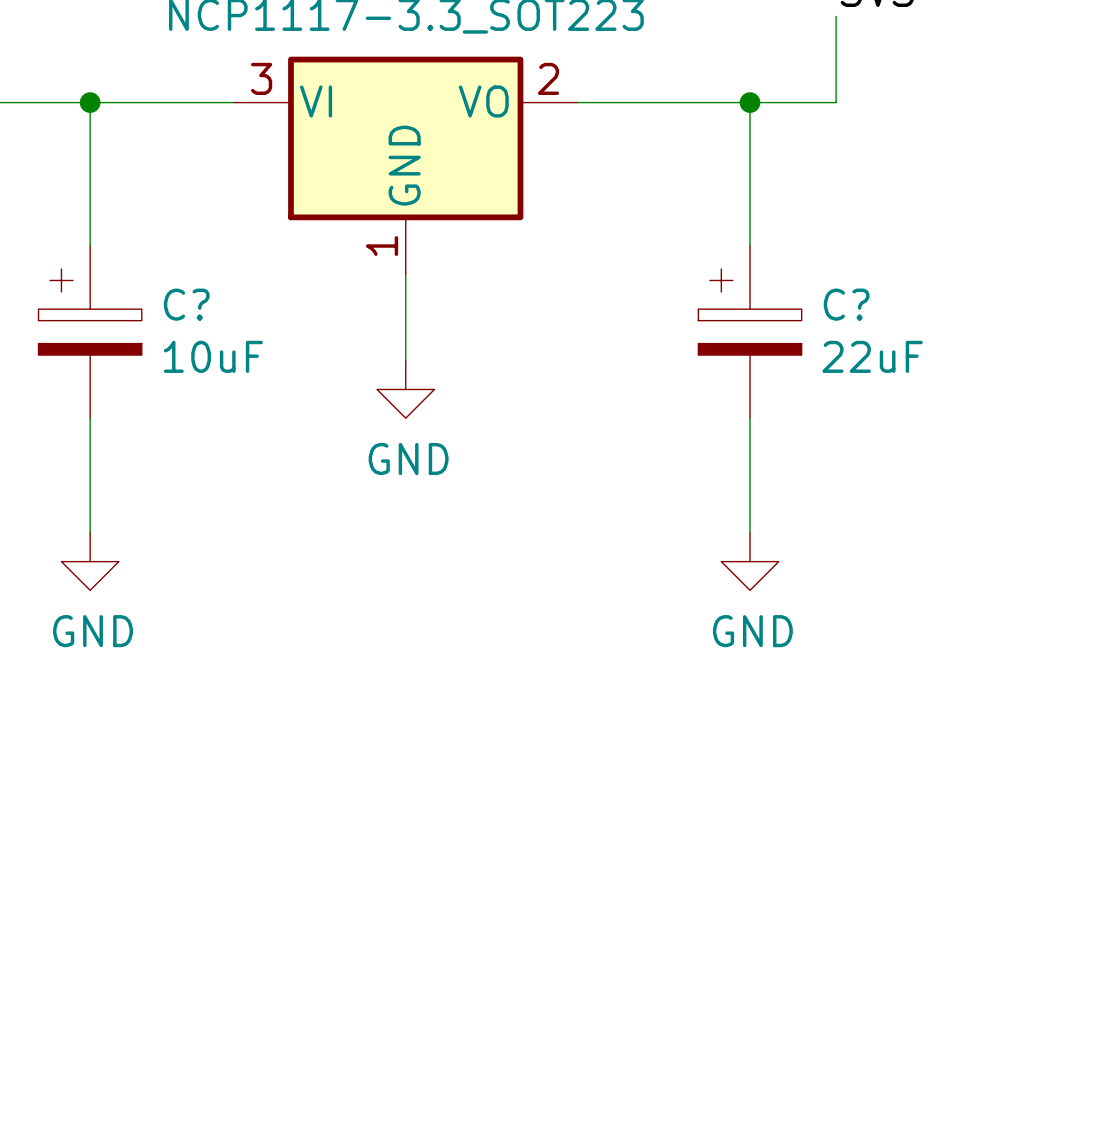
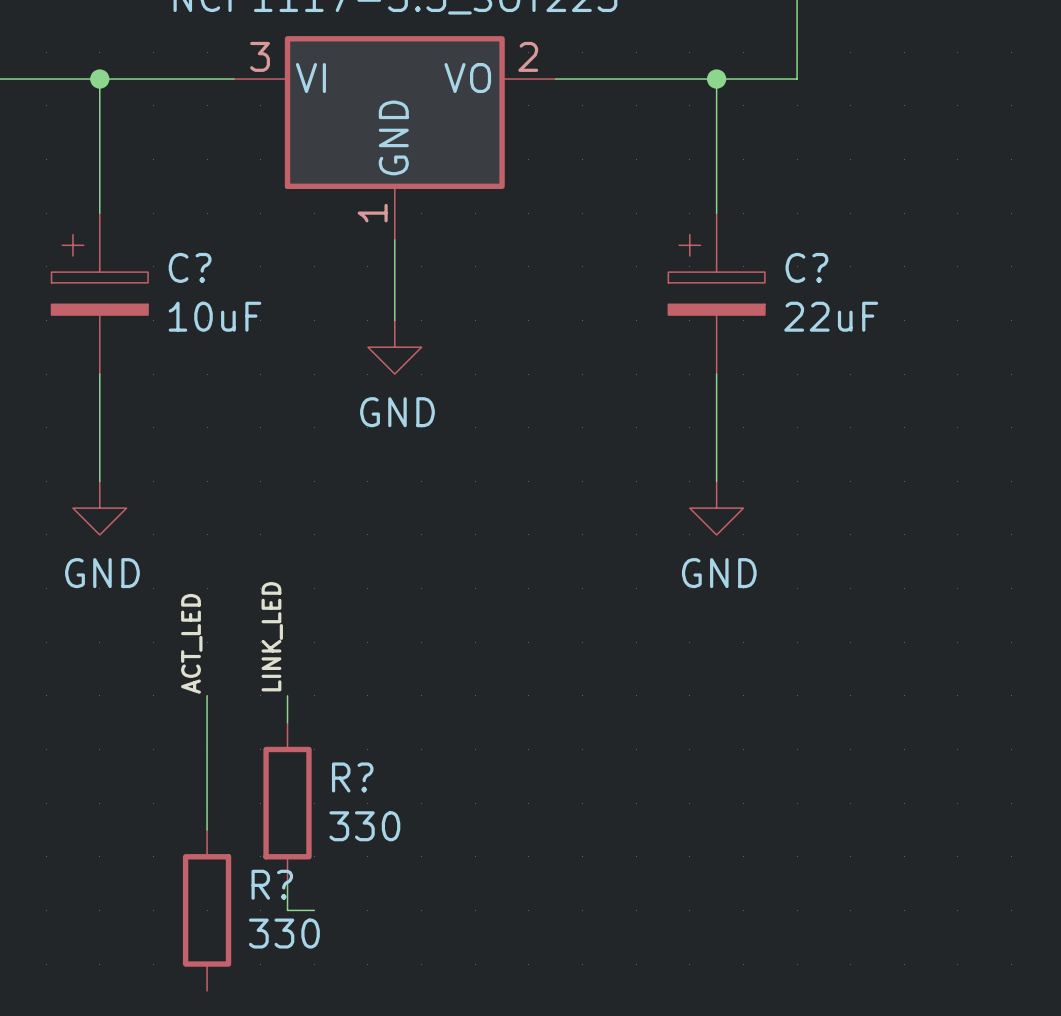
label: none -> LINK_LED (272, 636)
label: none -> ACT_LED (191, 643)
wire: none -> (207, 695) (207, 829)
wire: none -> (287, 695) (287, 722)
R?: none -> 330 (287, 803)
wire: none -> (287, 883) (287, 910) (314, 910)
R?: none -> 330 (207, 910)

